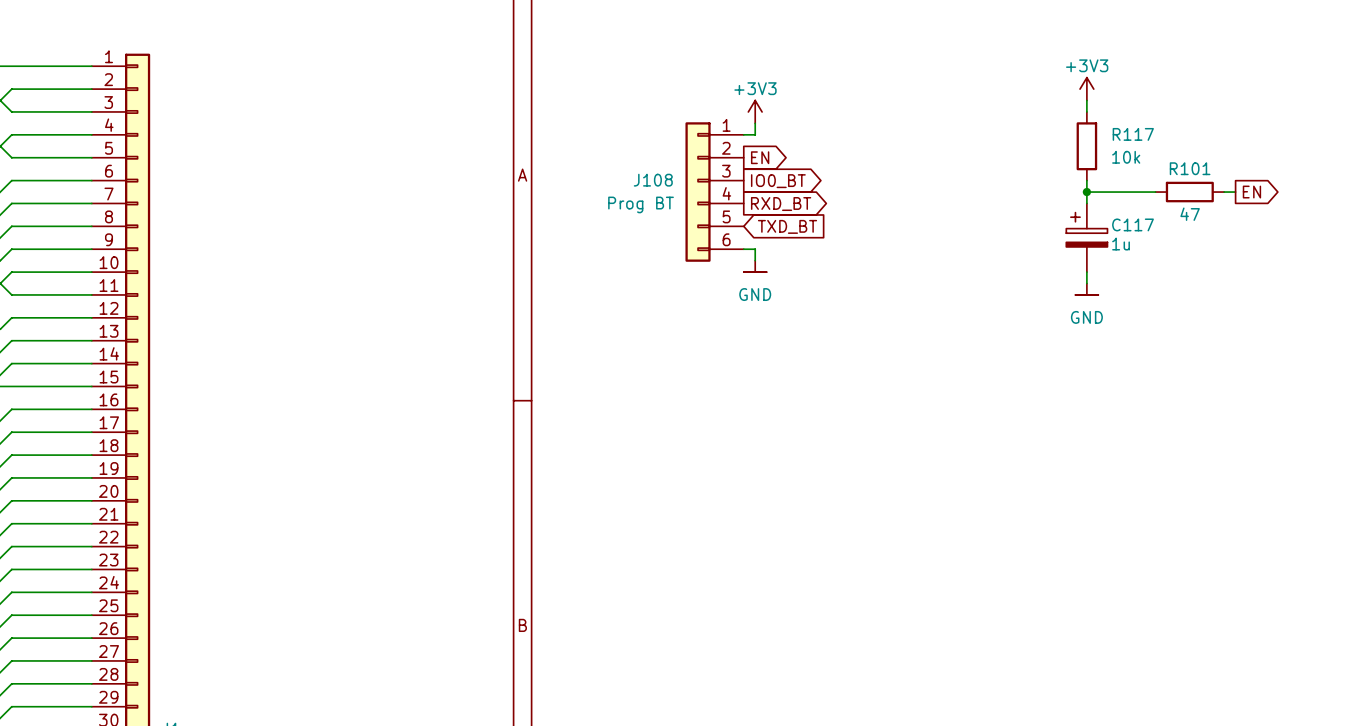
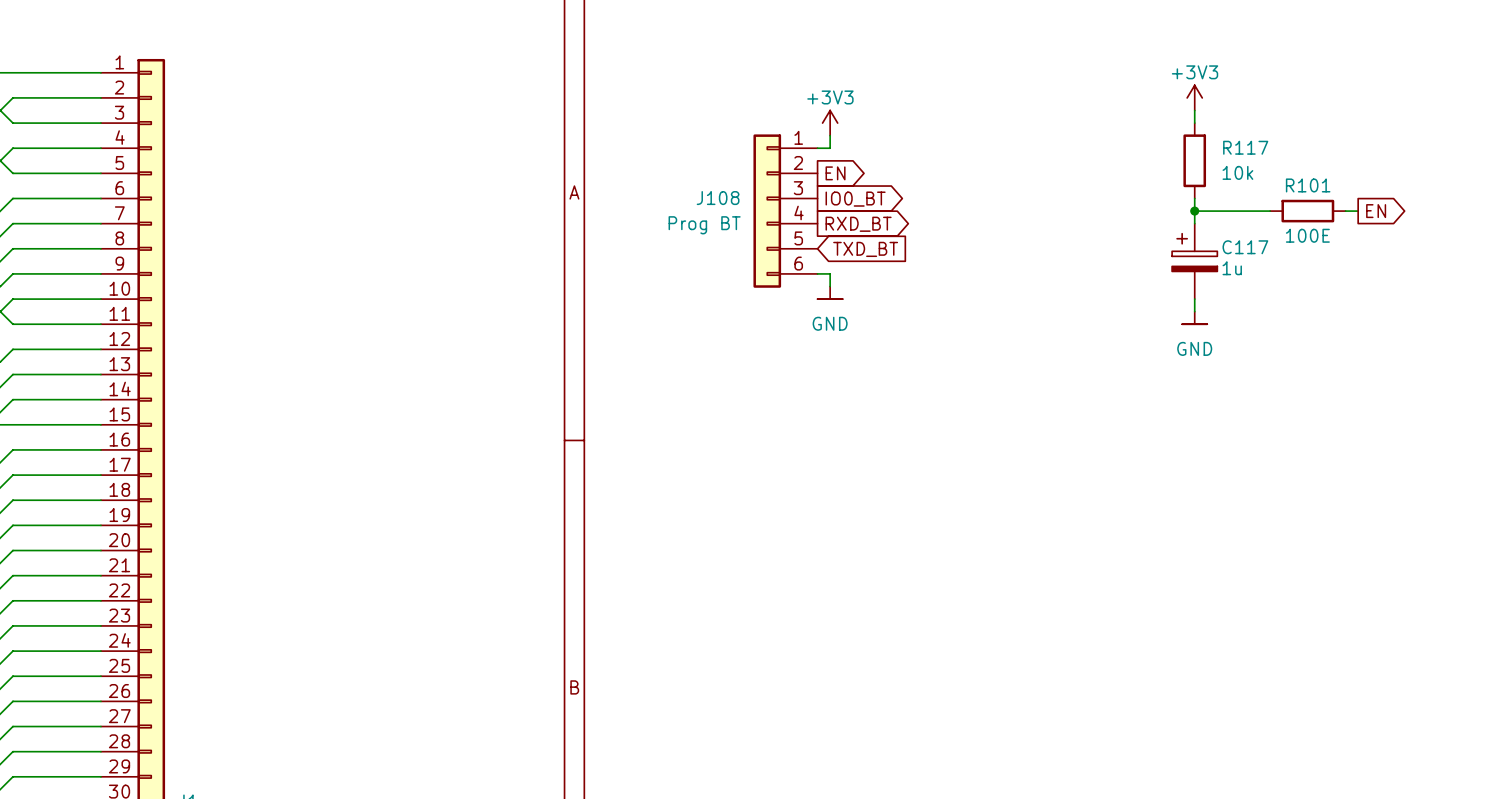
R101 value: 47 (1190, 214) -> 100E (1307, 235)

